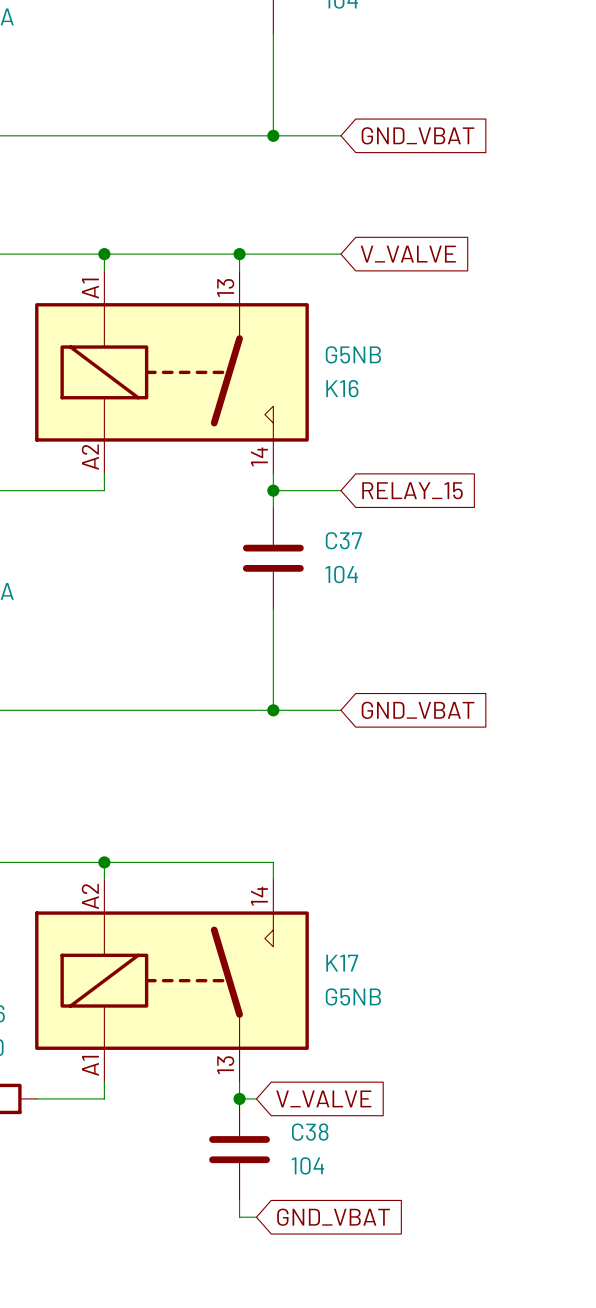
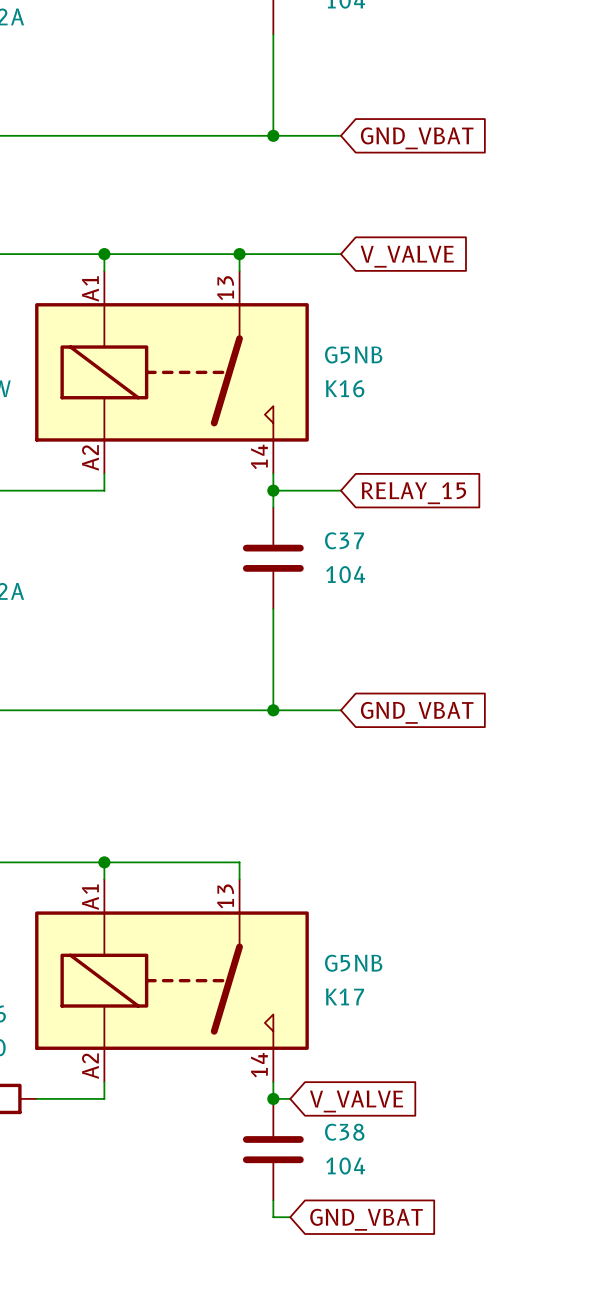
wire: (239, 862) (273, 862) (273, 879) -> (239, 862) (239, 879)
K17 flip: as is (171, 980) -> up-down (171, 980)
wire: (239, 1082) (239, 1098) (256, 1098) -> (273, 1082) (273, 1098) (290, 1098)
junction position: (239, 1098) -> (273, 1098)
global label position: V_VALVE (323, 1098) -> V_VALVE (356, 1101)
C38 position: (239, 1149) -> (273, 1149)
wire: (239, 1200) (239, 1217) (256, 1217) -> (273, 1200) (273, 1217) (290, 1217)
global label position: GND_VBAT (333, 1217) -> GND_VBAT (366, 1219)

